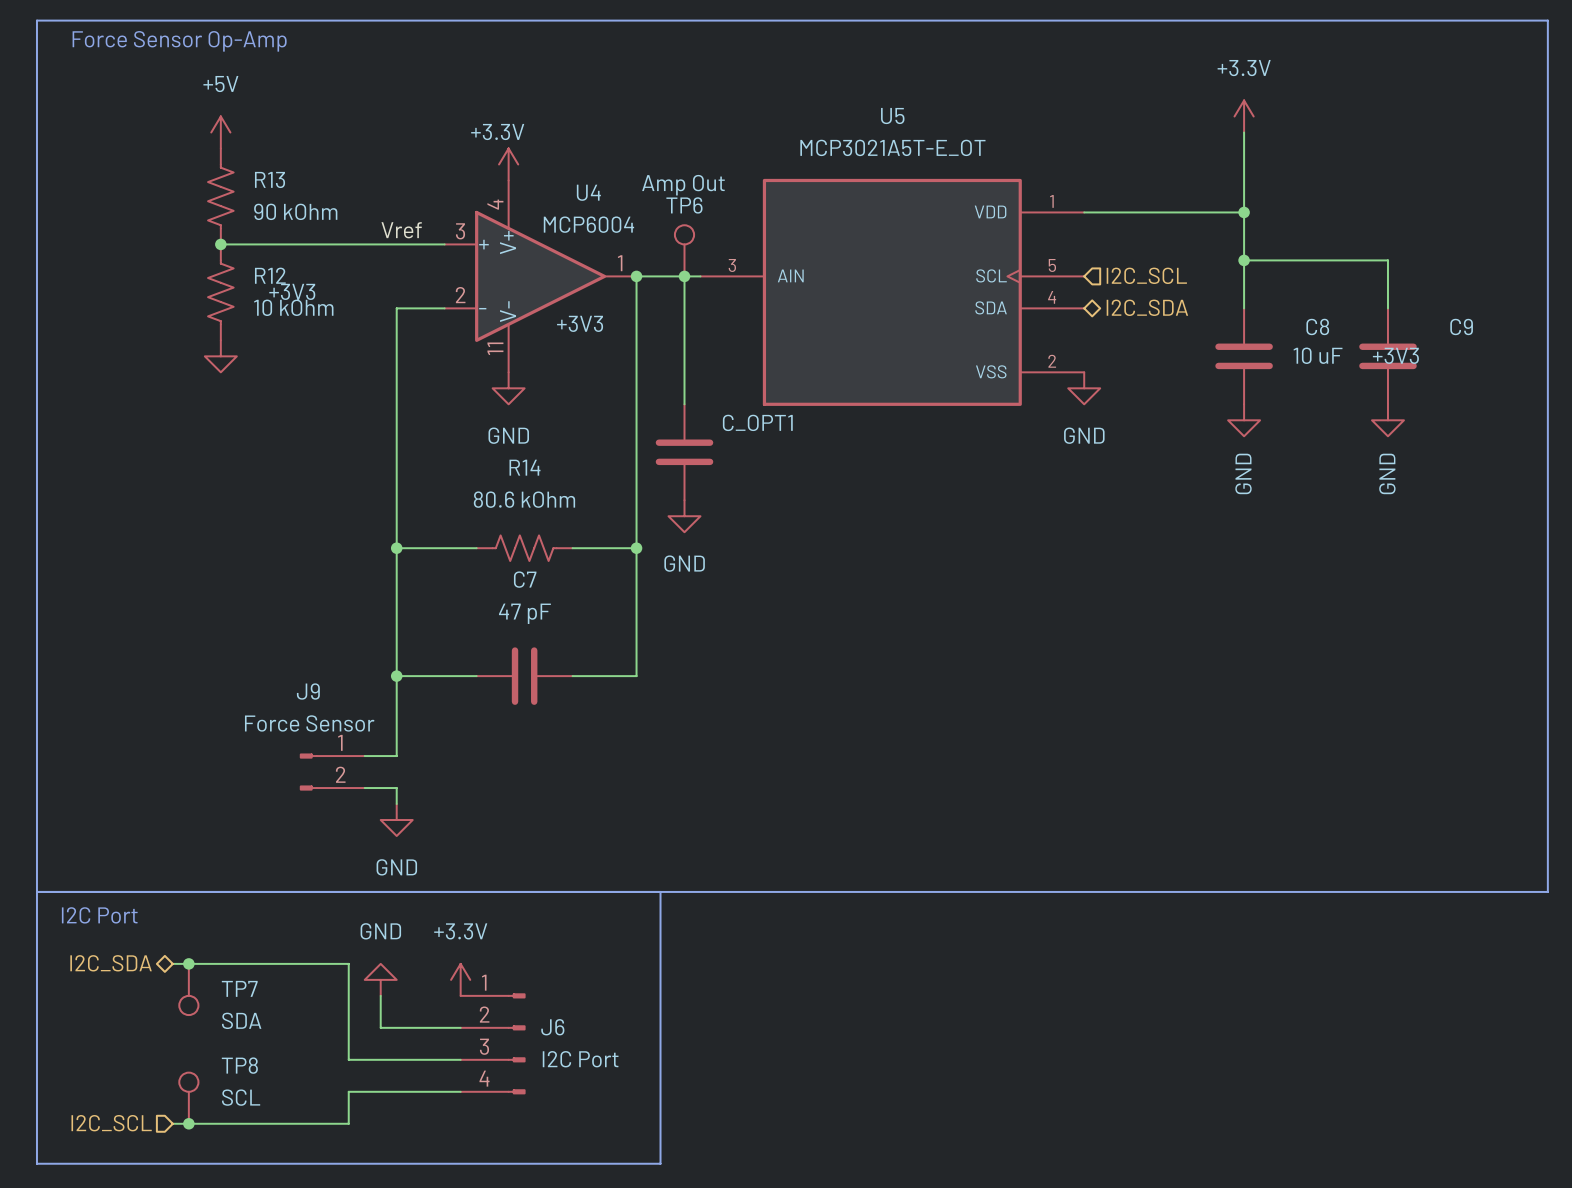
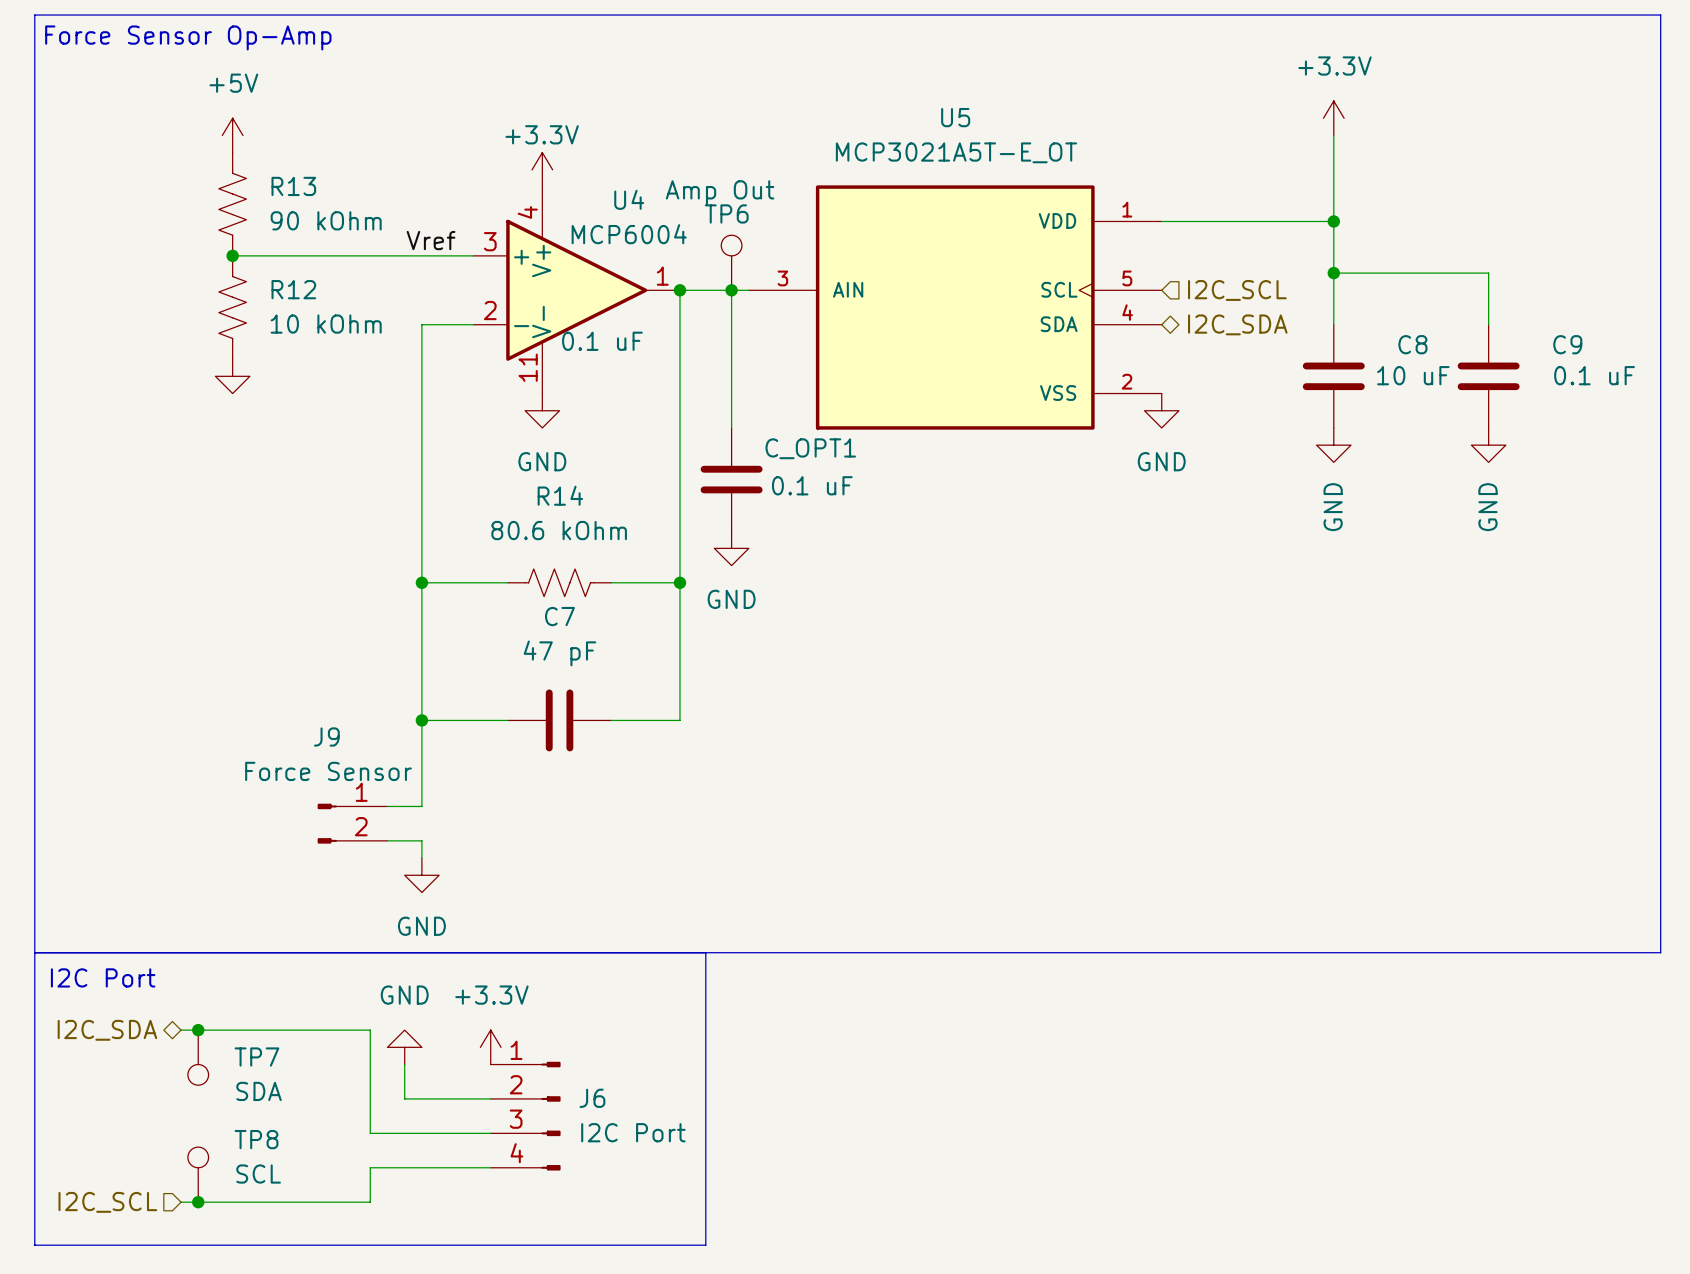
C_OPT1 value: +3V3 (292, 291) -> 0.1 uF (812, 485)
C9 value: +3V3 (580, 323) -> 0.1 uF (602, 341)
power symbol: +3V3 (220, 356) -> 0.1 uF (232, 376)

